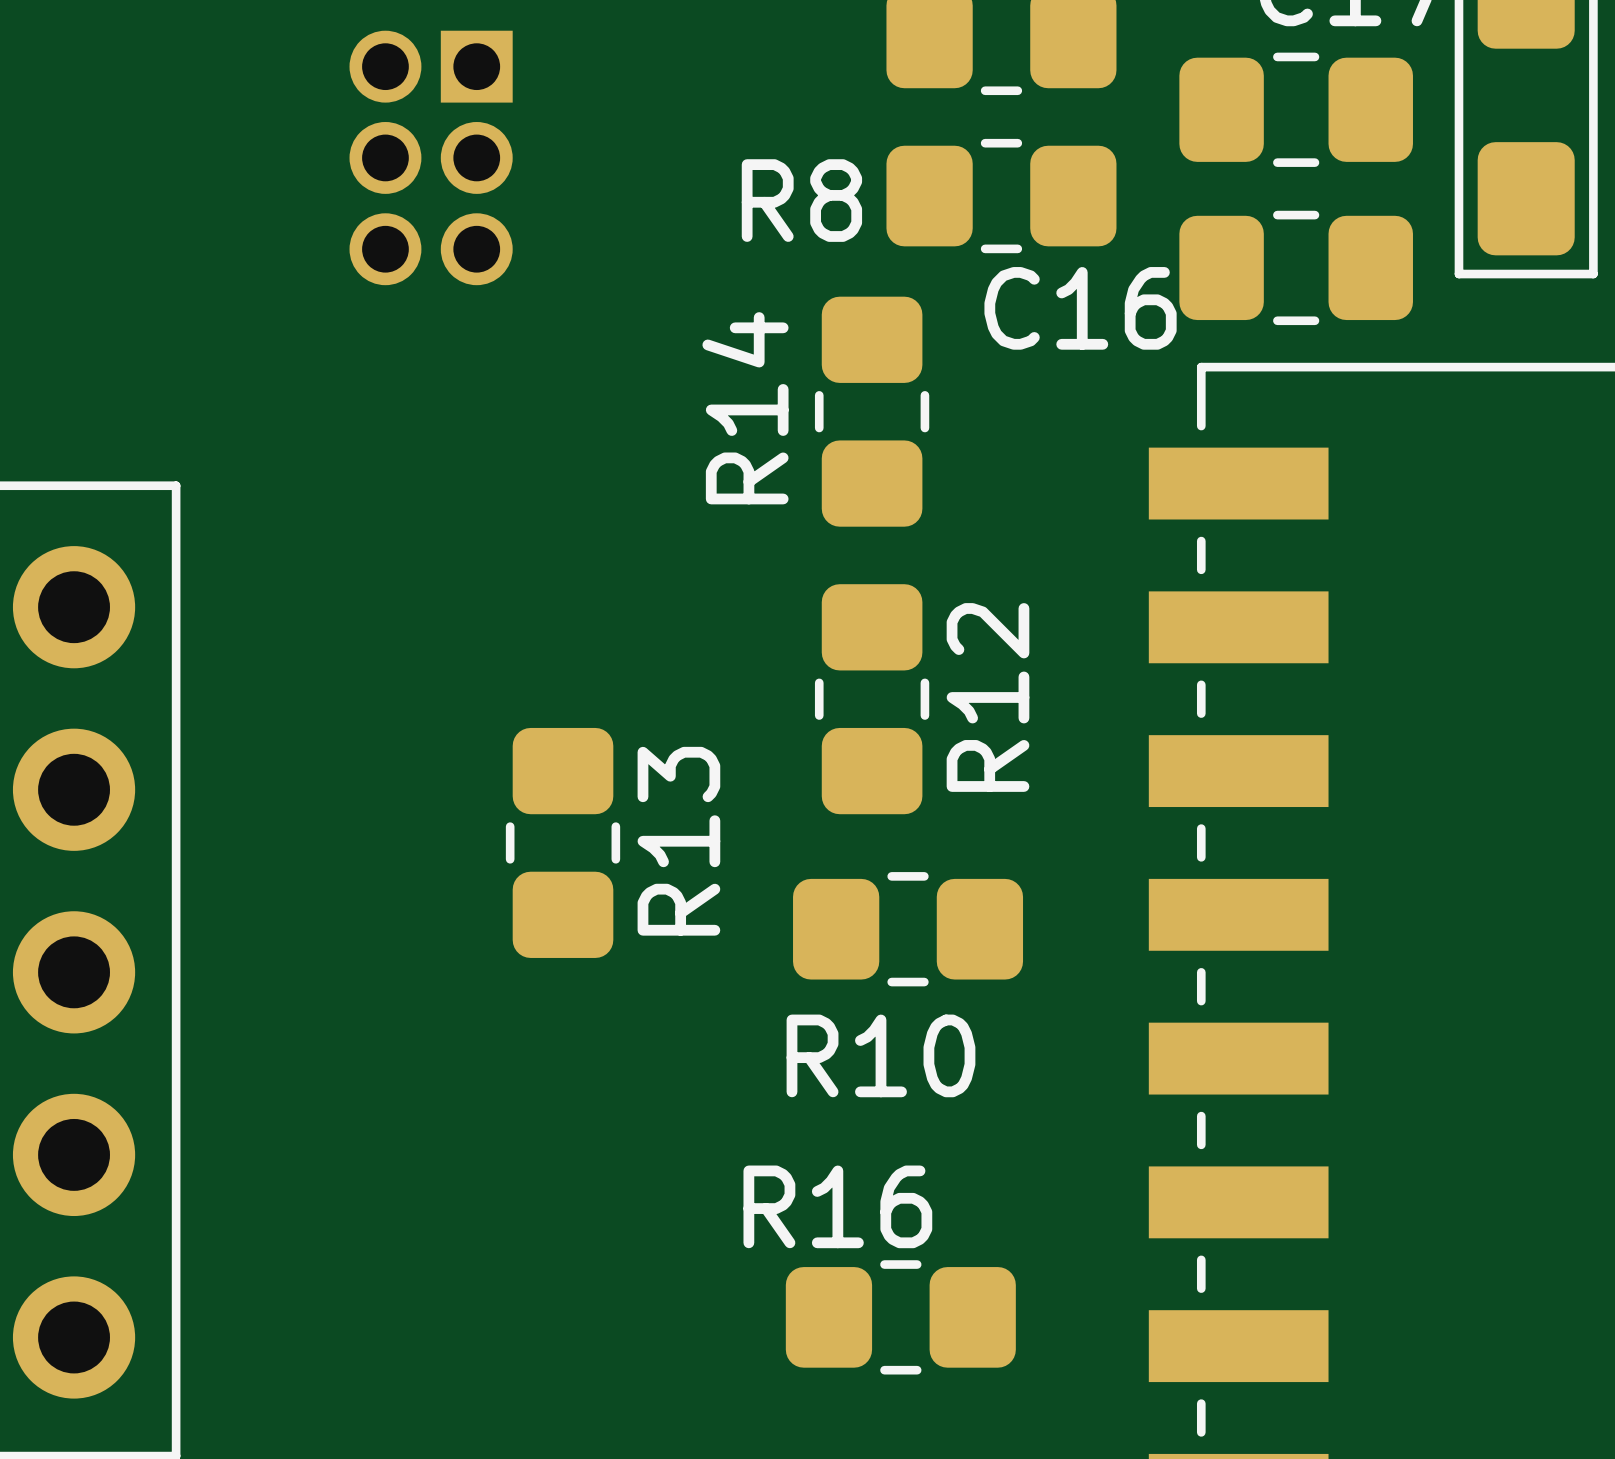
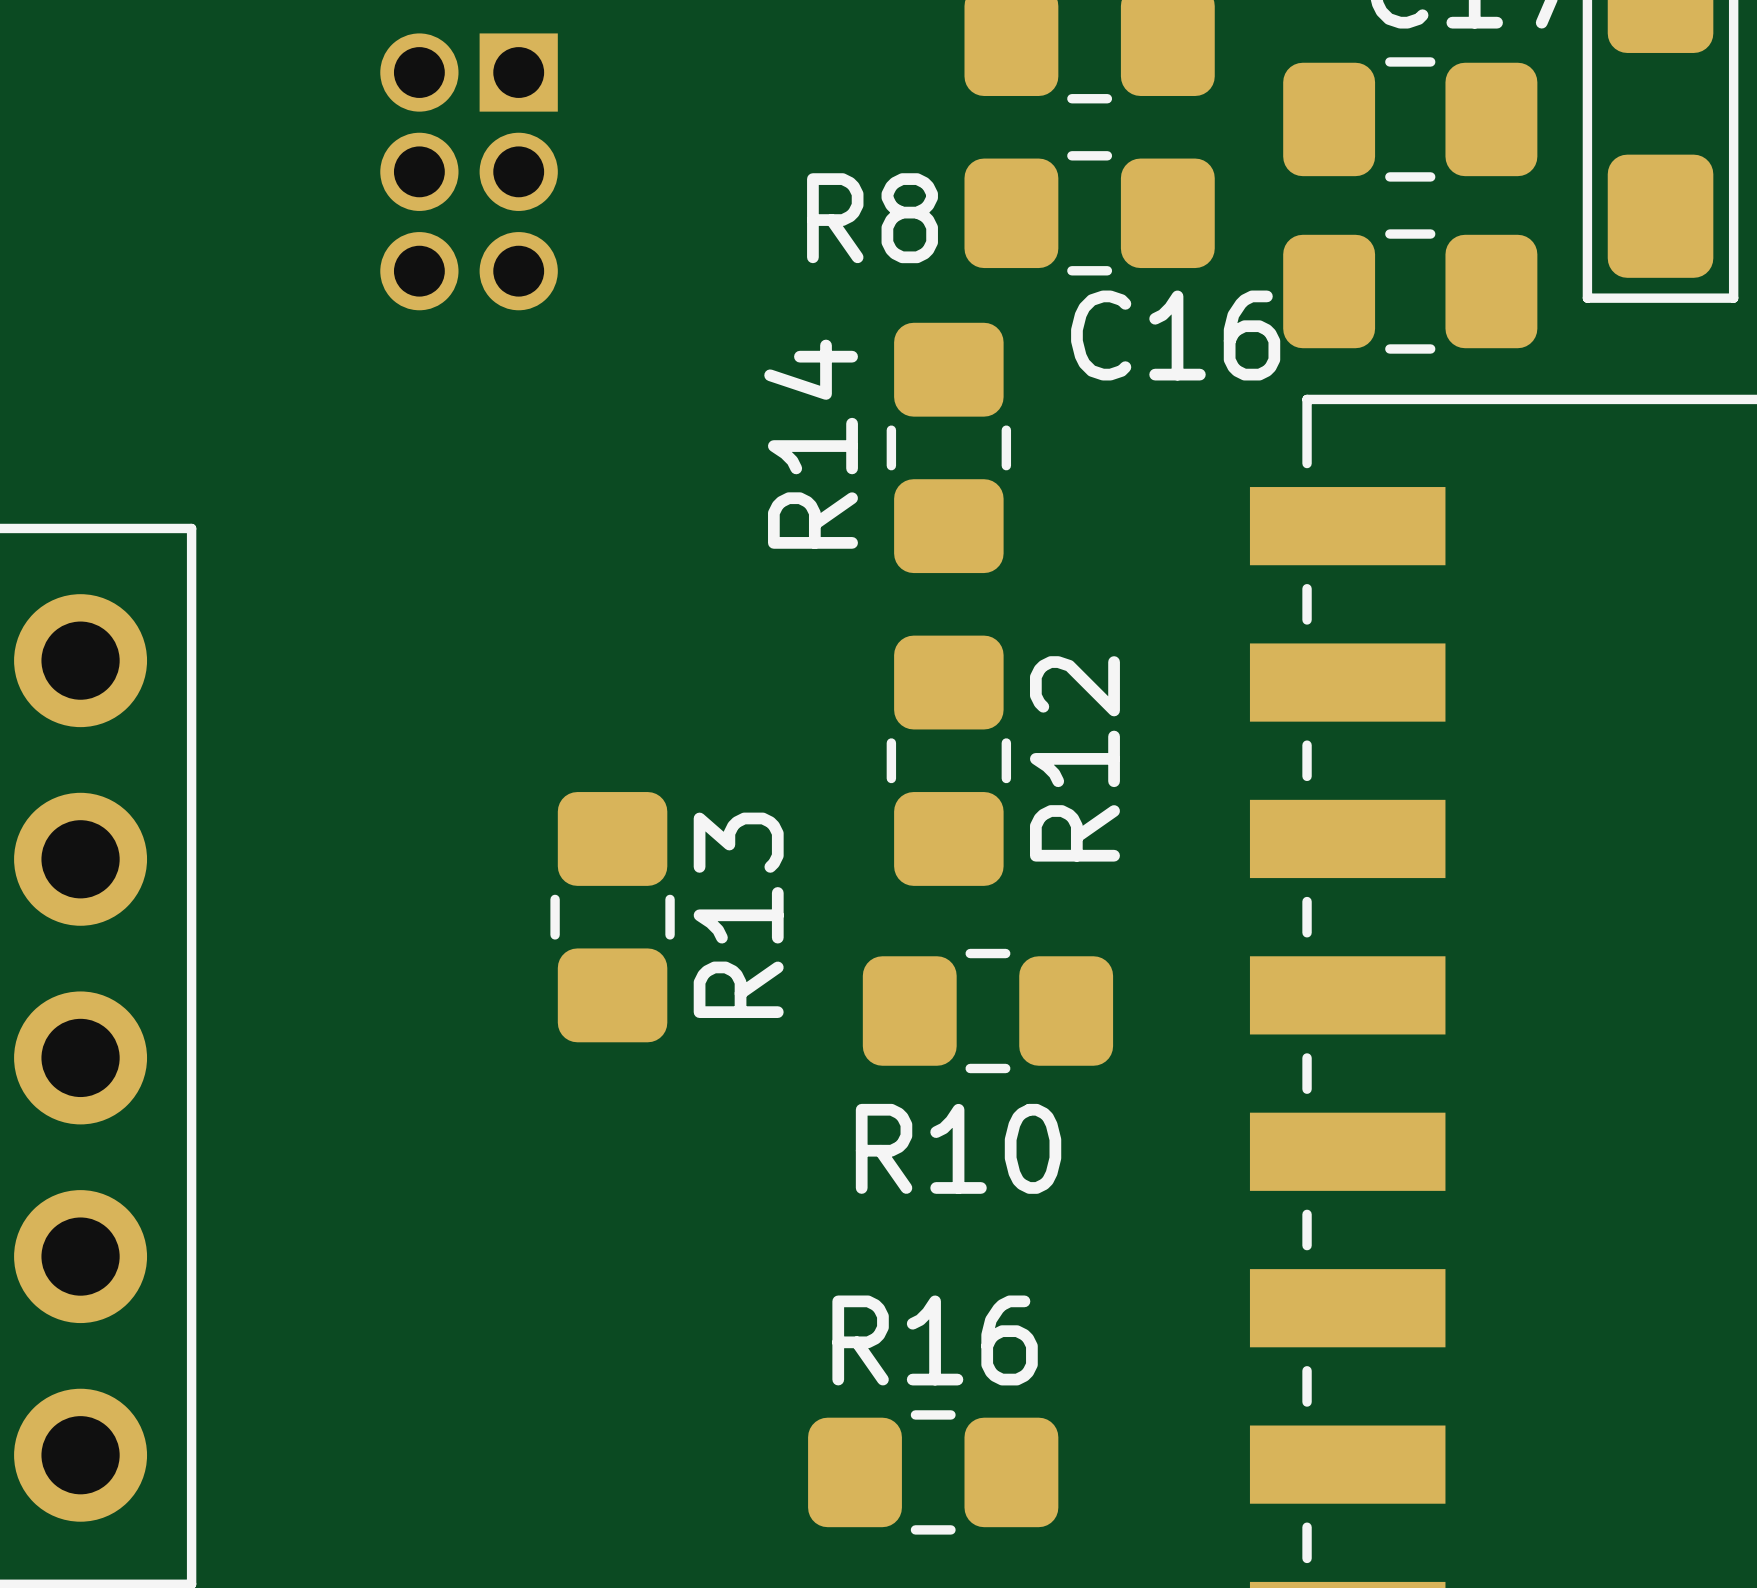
R16 name position: R16 (837, 1206) -> R16 (935, 1340)
R16 position: (900, 1317) -> (933, 1472)

